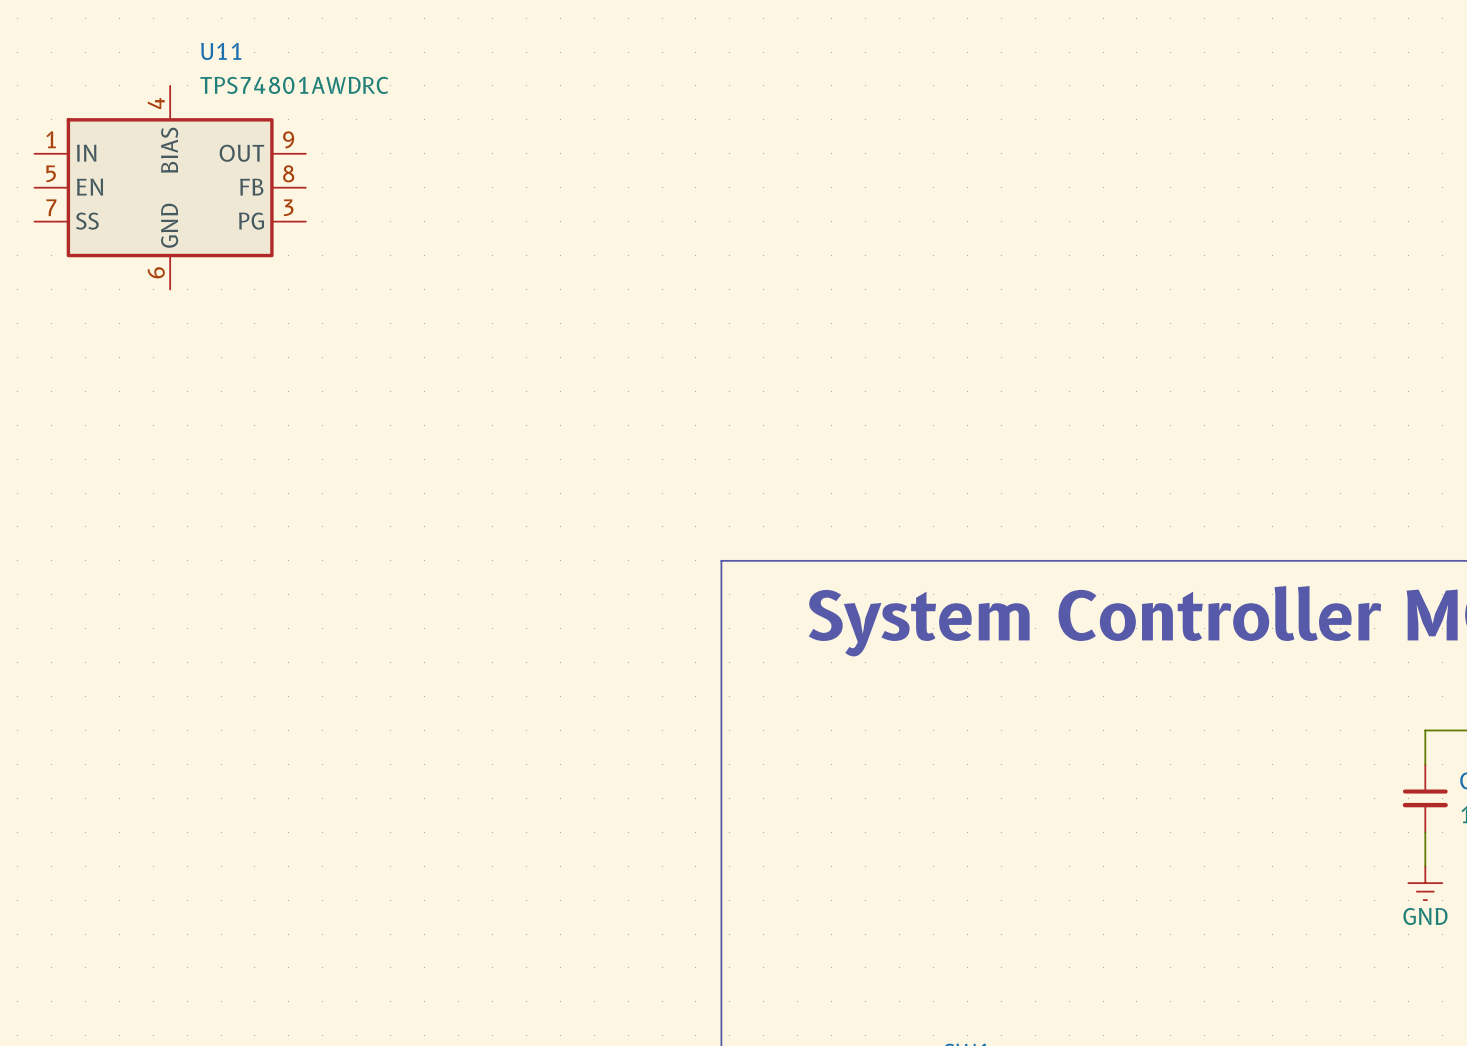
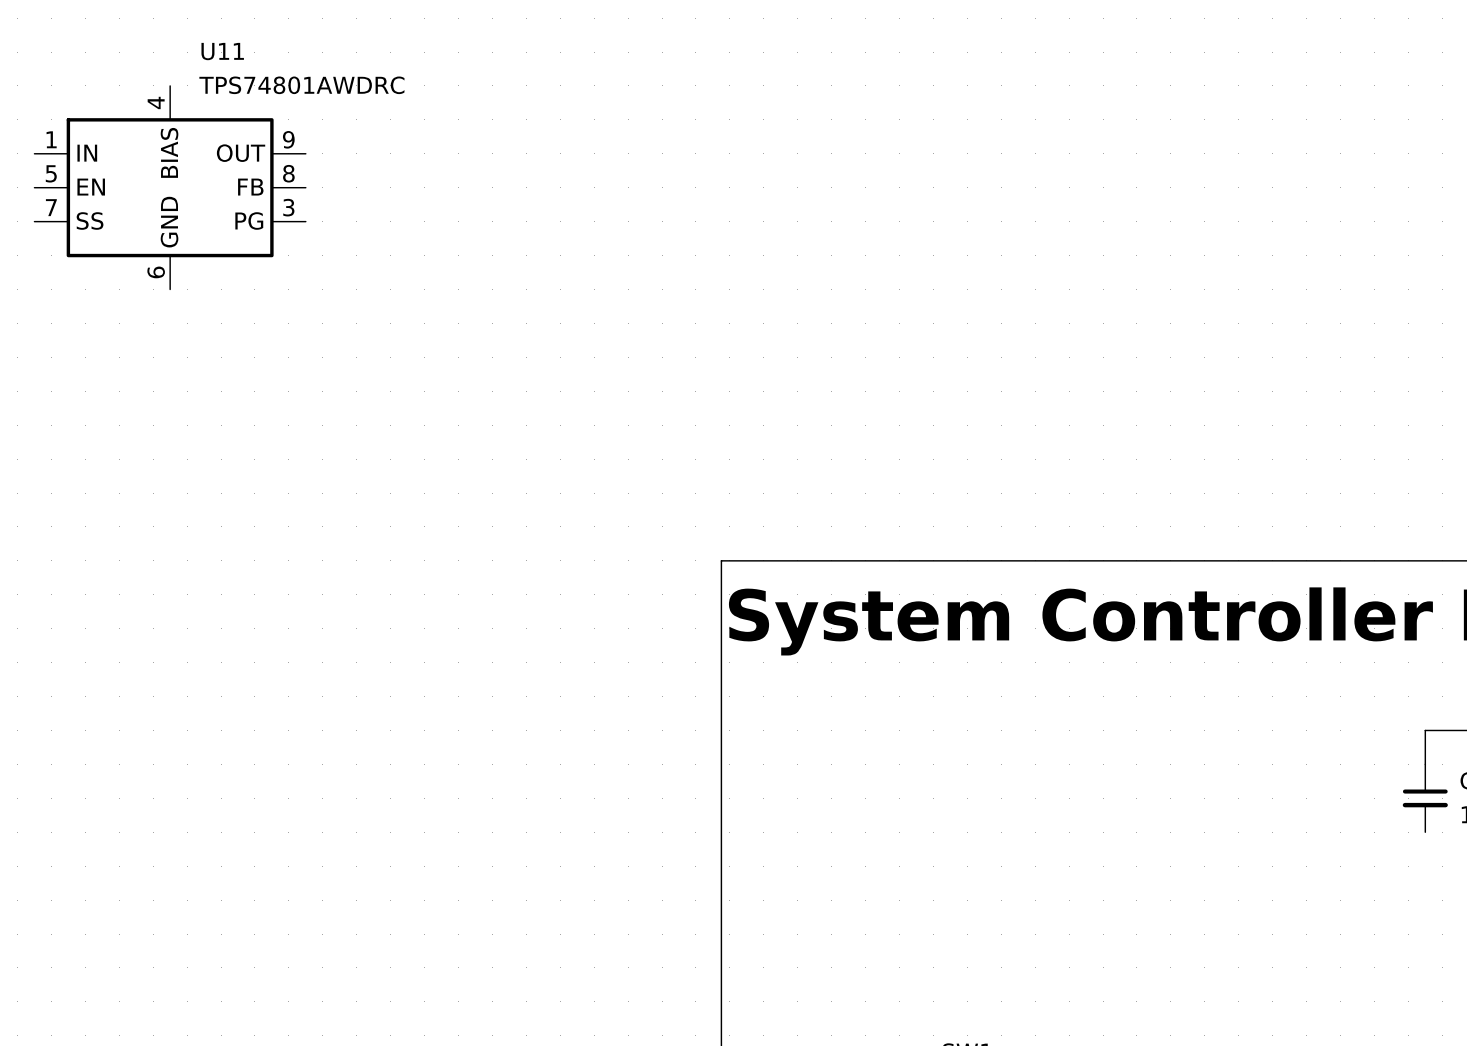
wire: (1425, 832) (1425, 866) -> none
power symbol: GND (1425, 883) -> none

